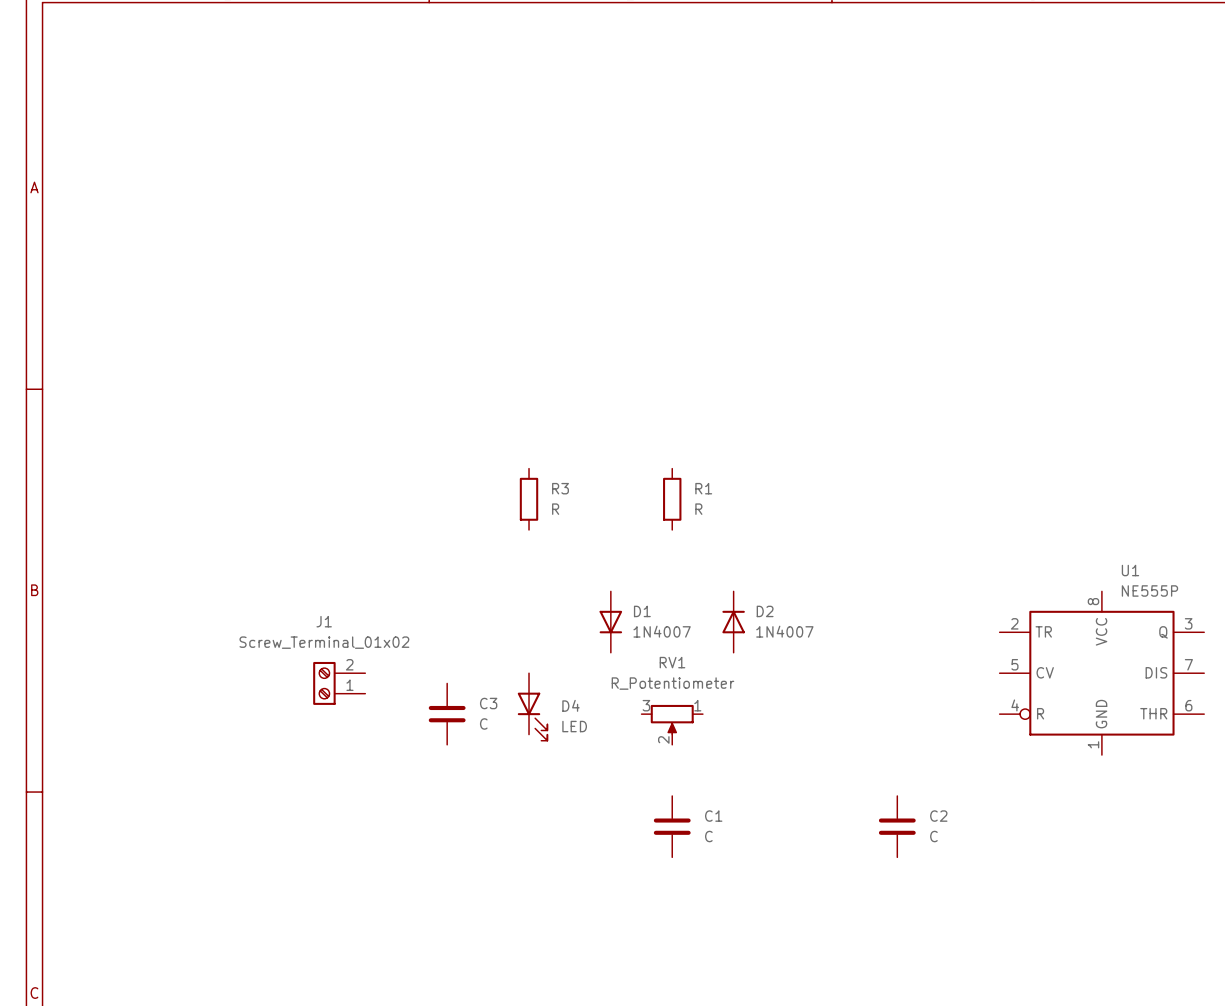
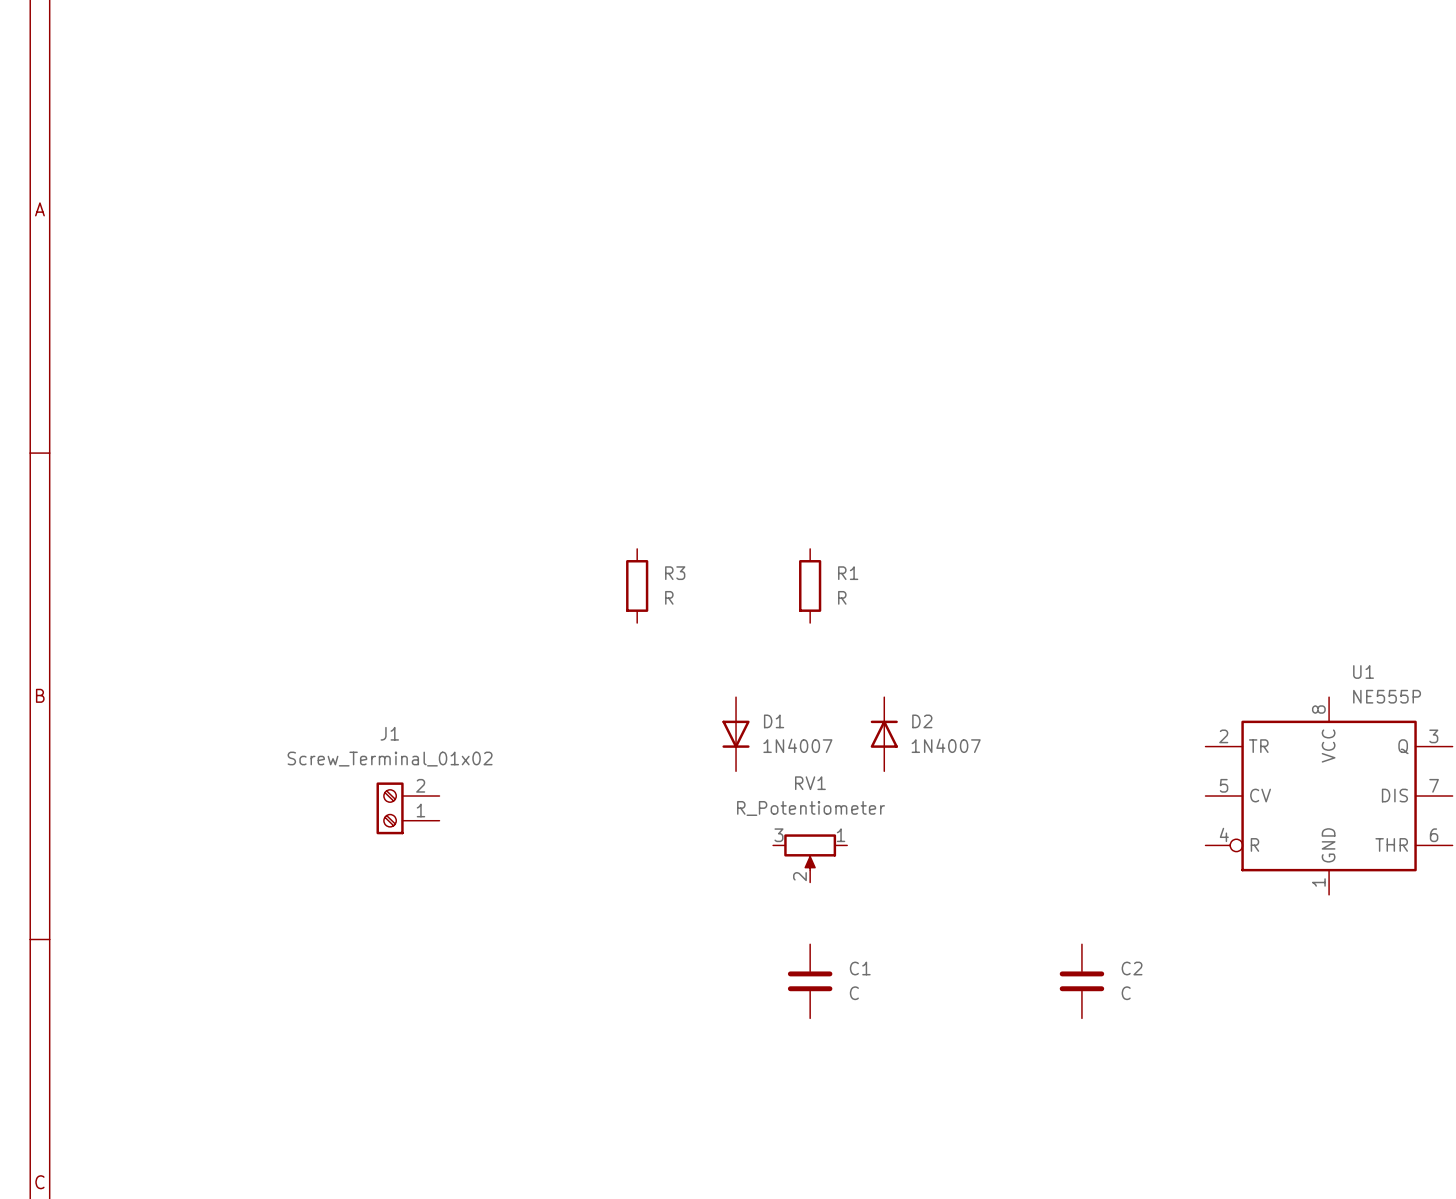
D4: LED (532, 706) -> none
C3: C (447, 714) -> none

